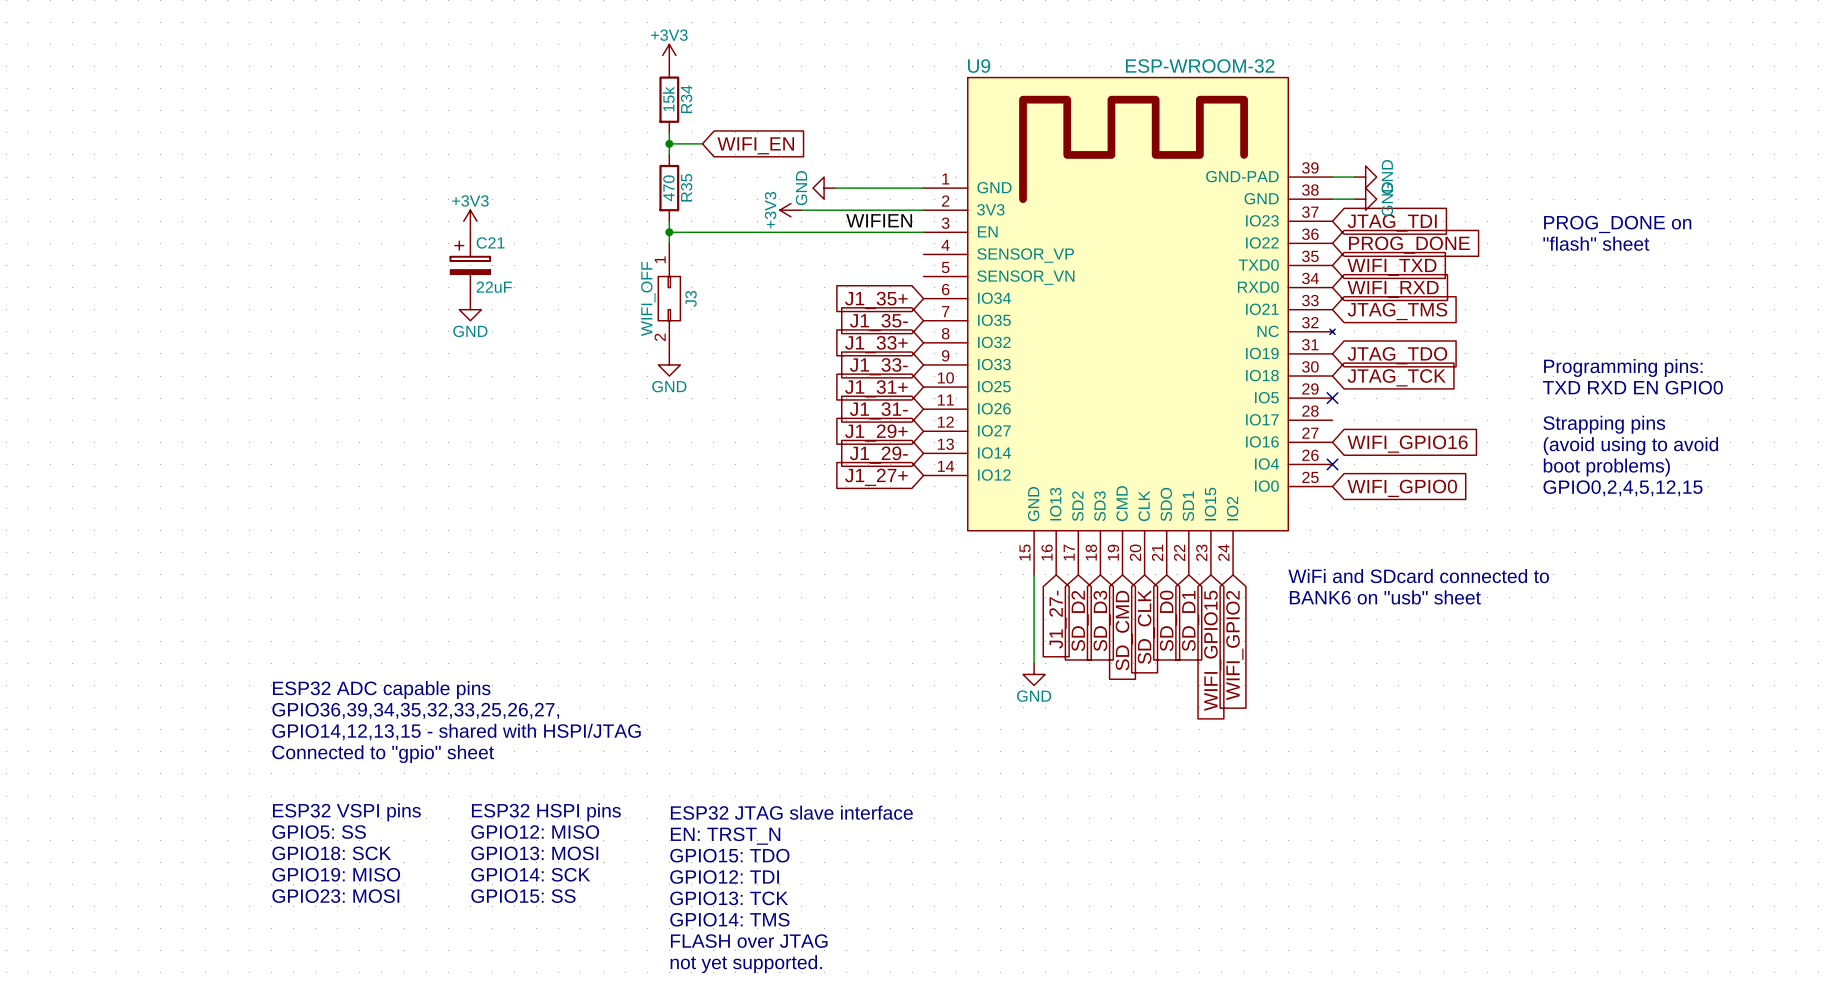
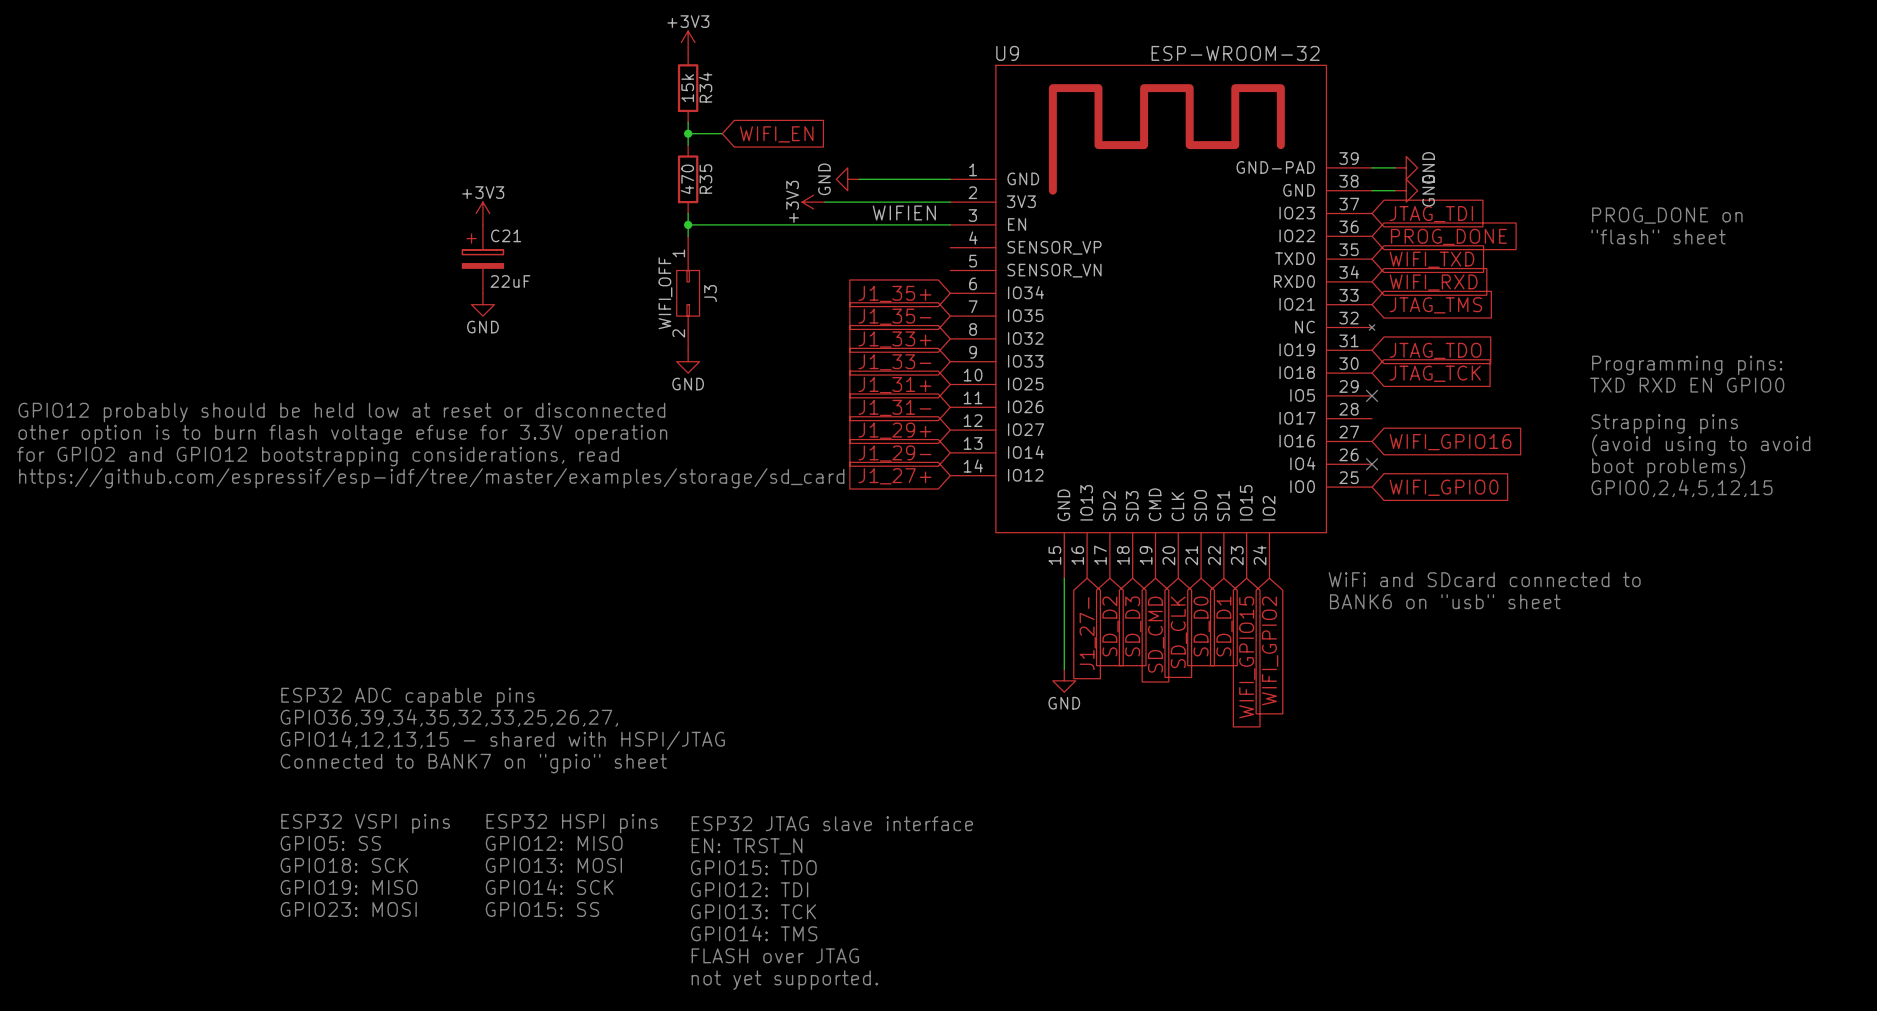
text: none -> GPIO12 probably should be held low at reset or disconnected (341, 412)
text: none -> other option is to burn flash voltage efuse for 3.3V operation (342, 434)
text: none -> for GPIO2 and GPIO12 bootstrapping considerations, read (318, 456)
text: none -> https://github.com/espressif/esp-idf/tree/master/examples/storage/sd_card (431, 478)
text: Connected to "gpio" sheet (383, 754) -> Connected to BANK7 on "gpio" sheet (473, 763)

